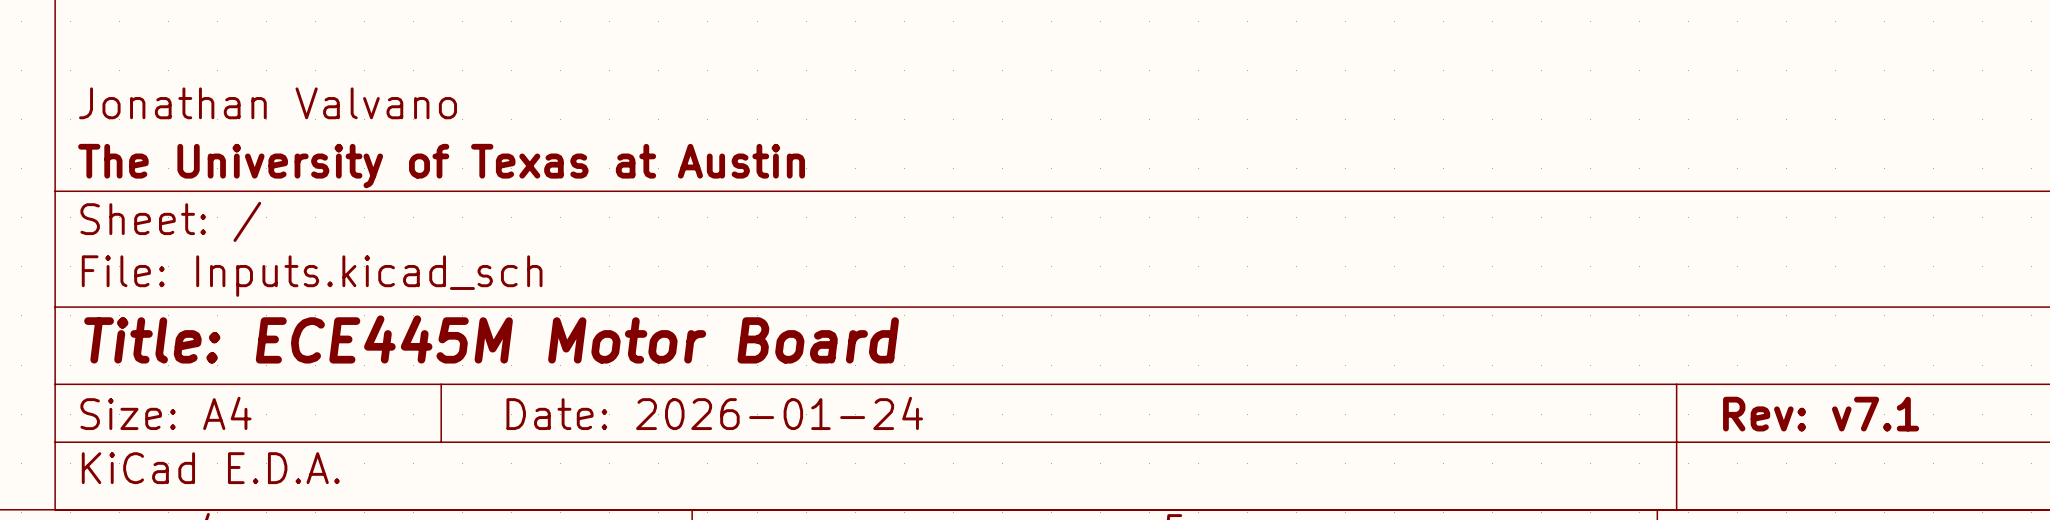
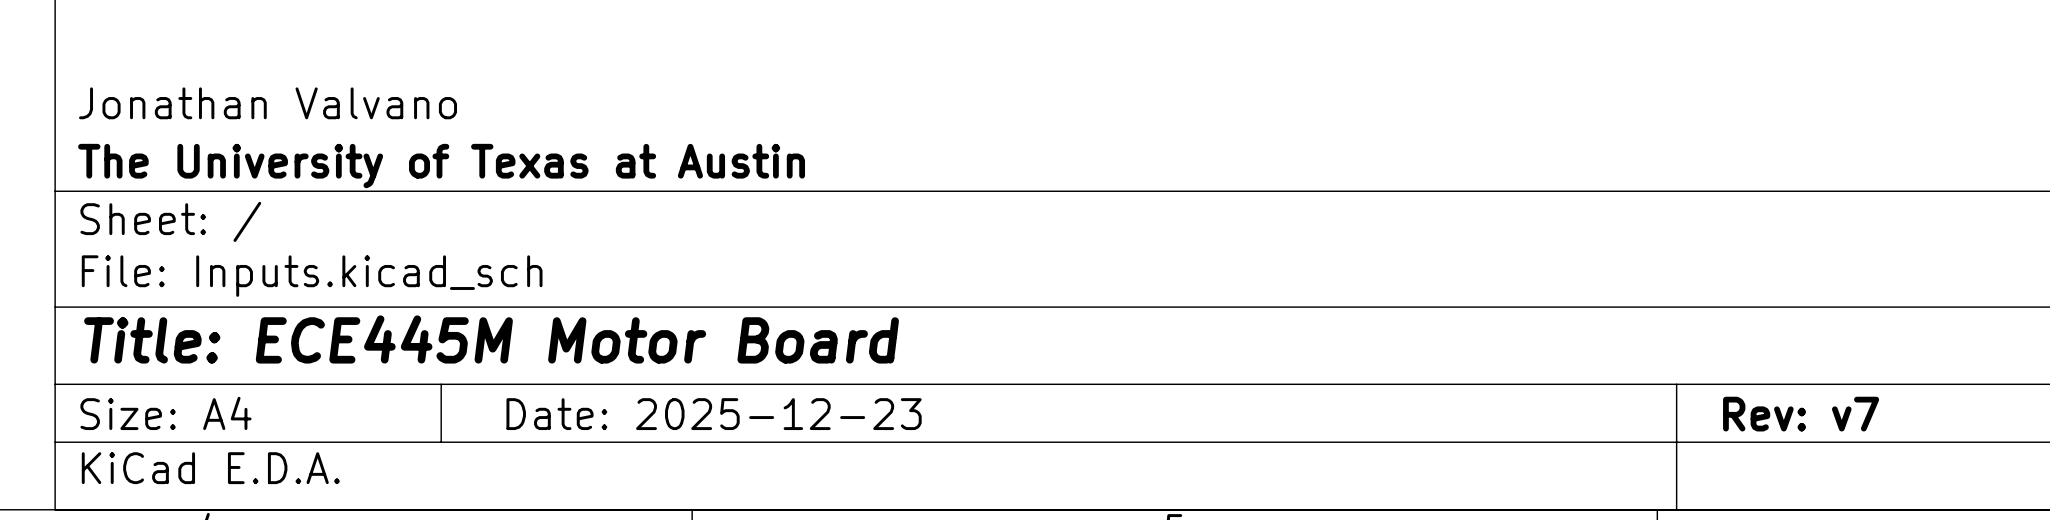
title block: Date: 2026-01-24 (714, 413) -> Date: 2025-12-23 (714, 414)
title block: Rev: v7.1 (1821, 414) -> Rev: v7 (1801, 414)

